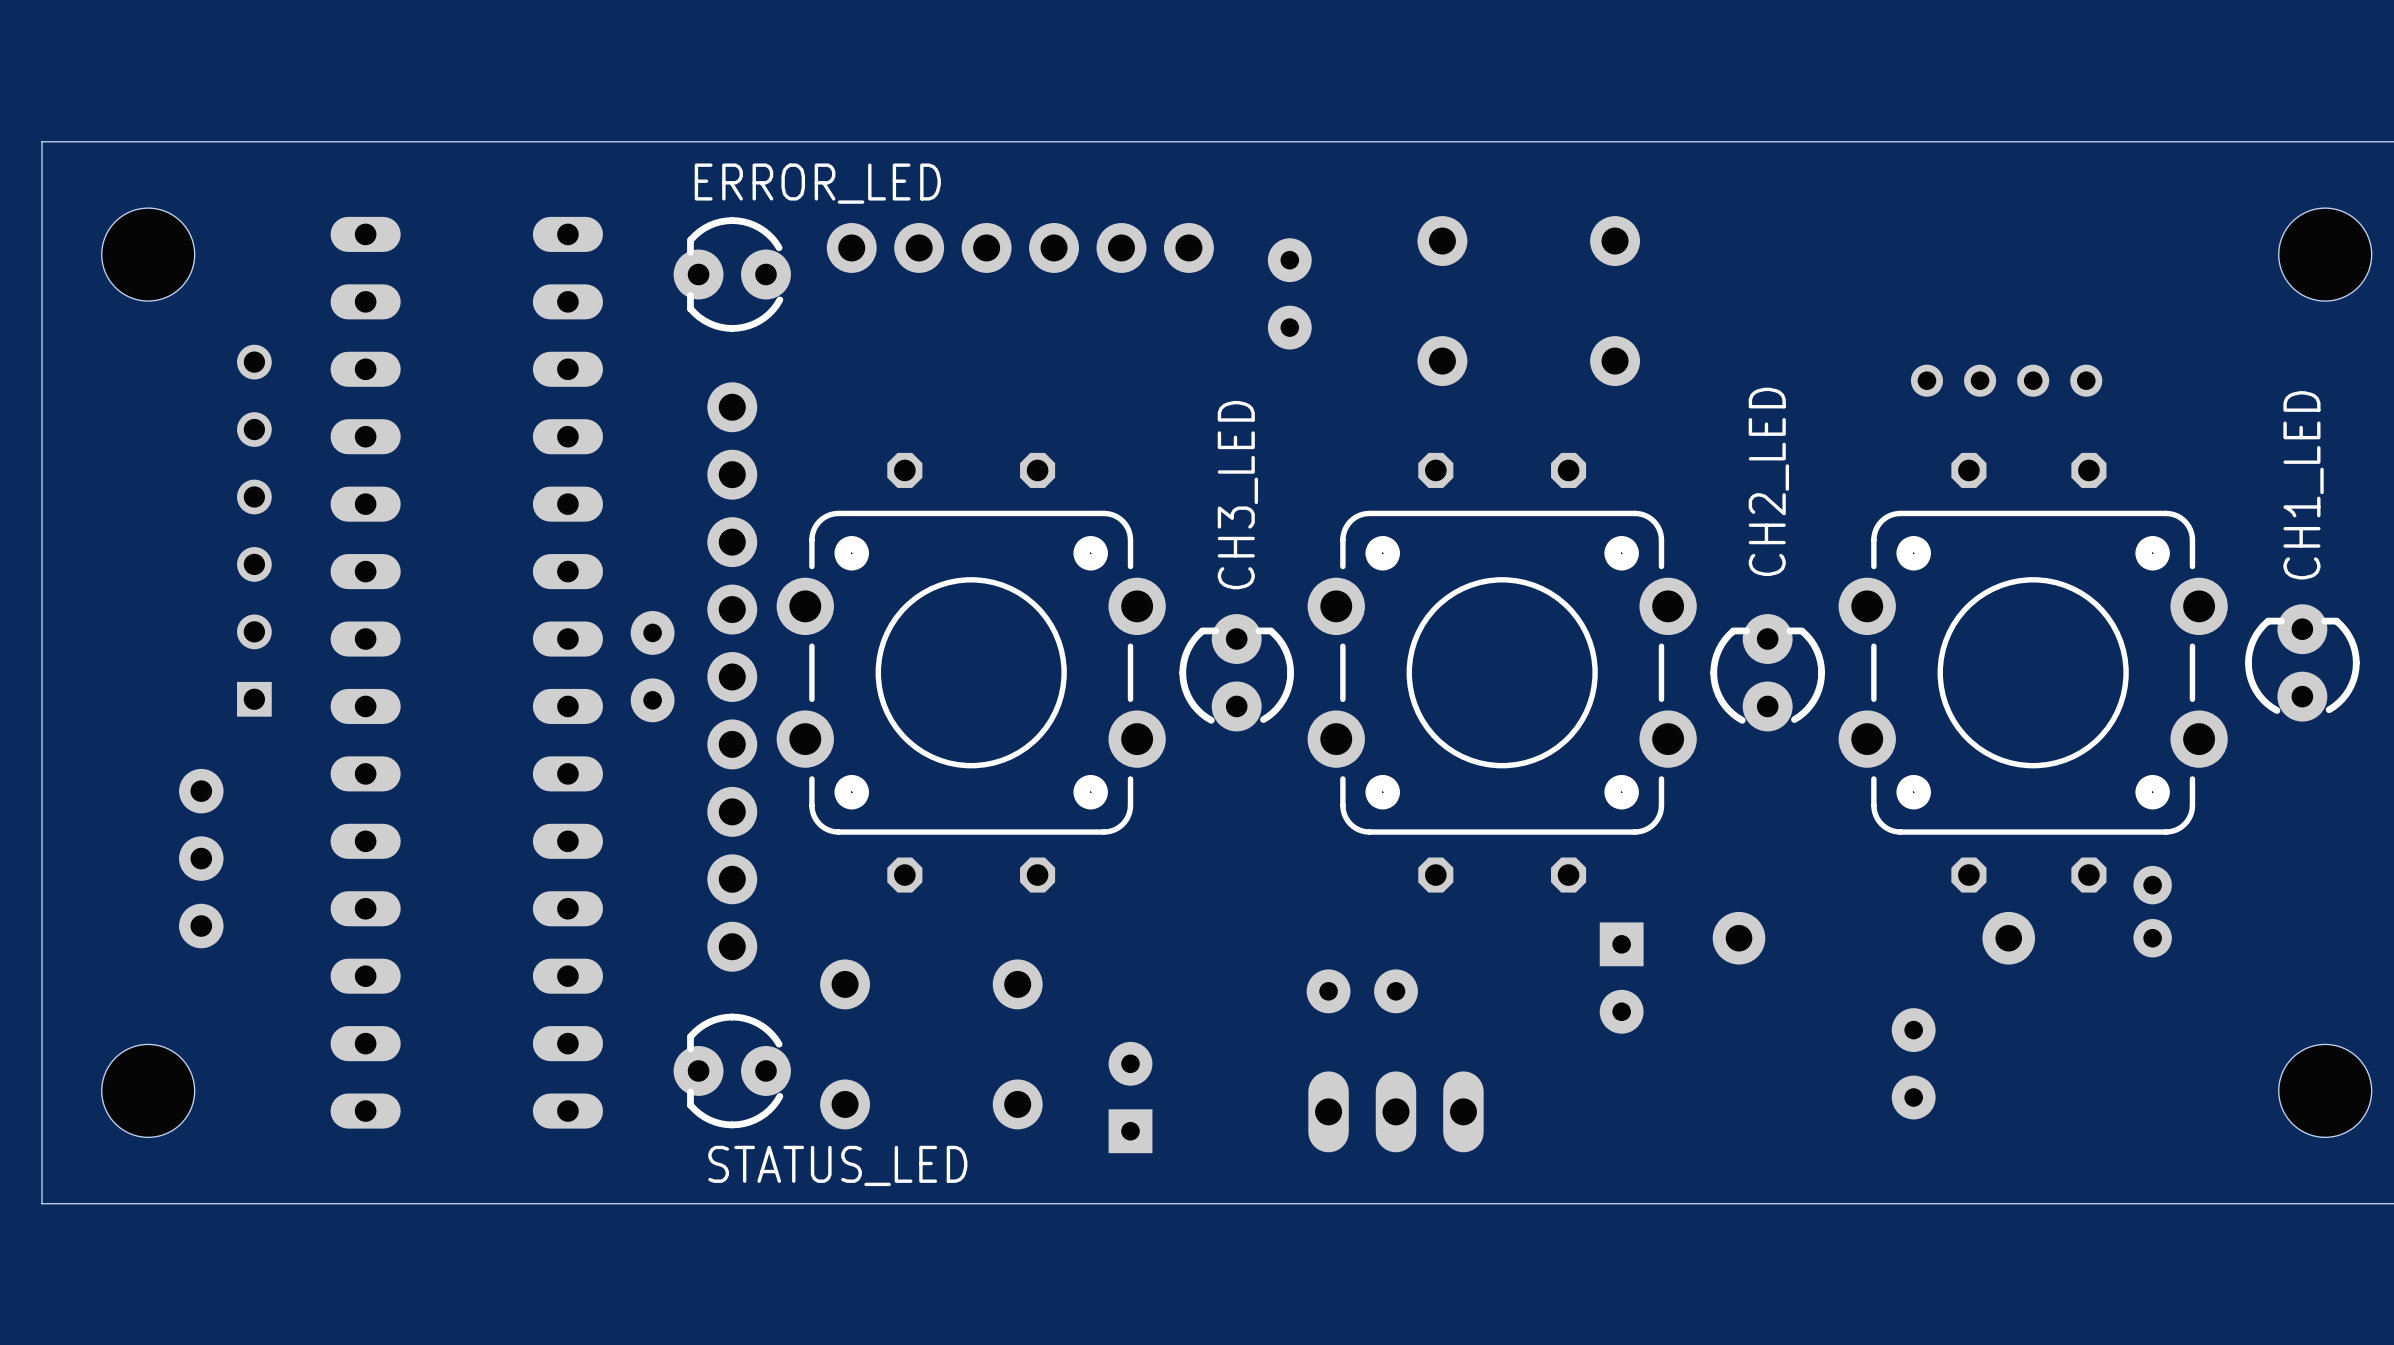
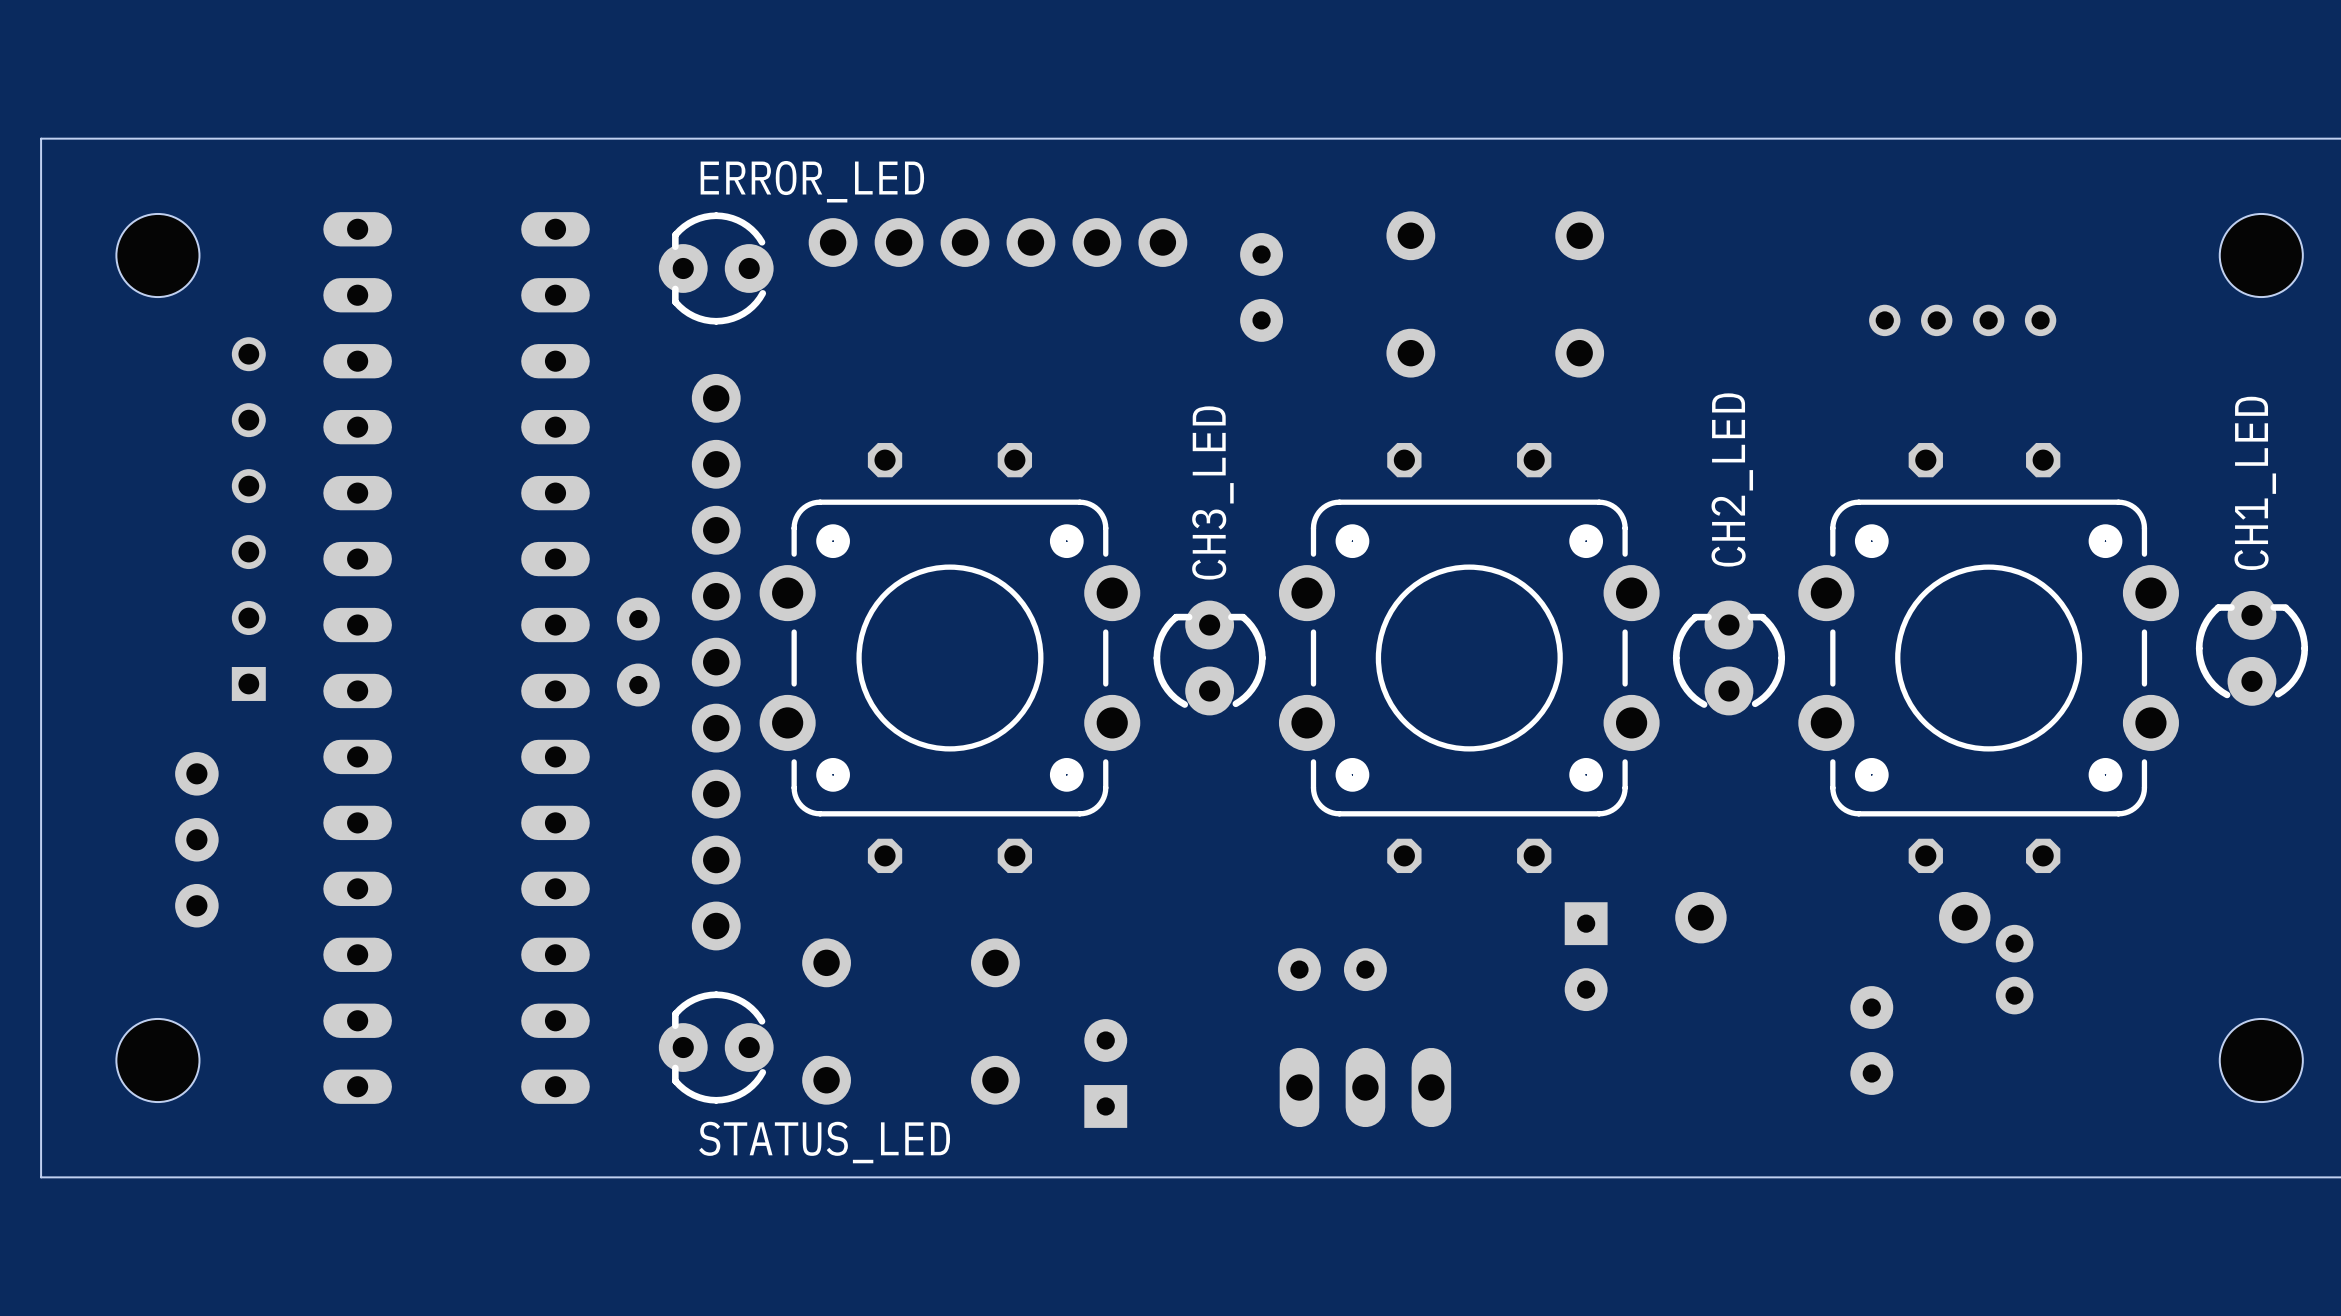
hole size: [101, 208, 195, 302] -> [116, 213, 200, 298]
hole size: [2278, 208, 2372, 302] -> [2219, 213, 2303, 298]
part position: (2006, 380) -> (1962, 320)
part position: (2152, 911) -> (2014, 969)
hole size: [101, 1044, 195, 1138] -> [116, 1018, 200, 1103]
hole size: [2278, 1044, 2372, 1138] -> [2219, 1018, 2303, 1103]

